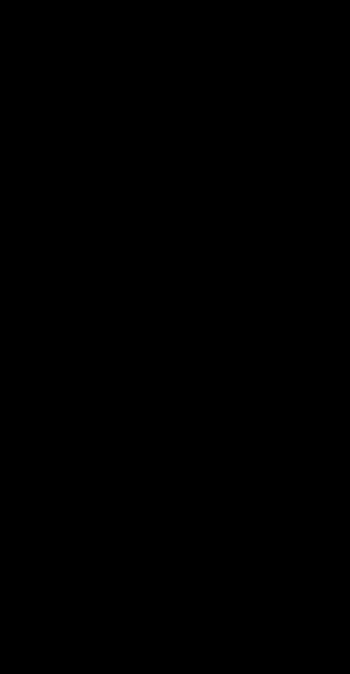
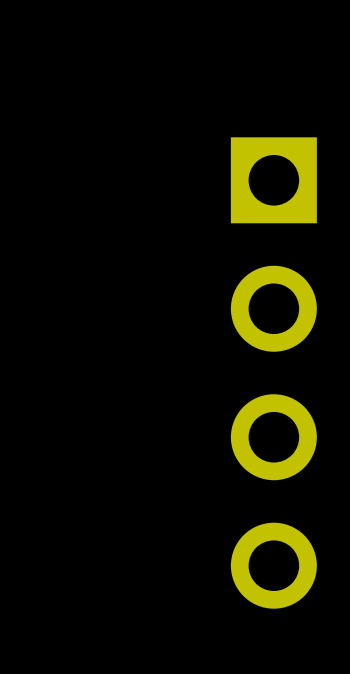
part: none -> (273, 372)

